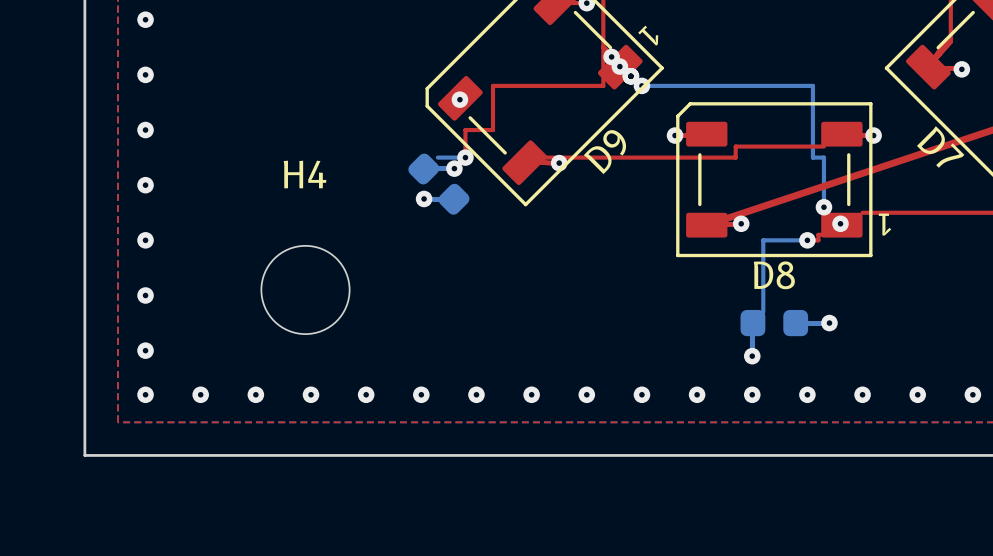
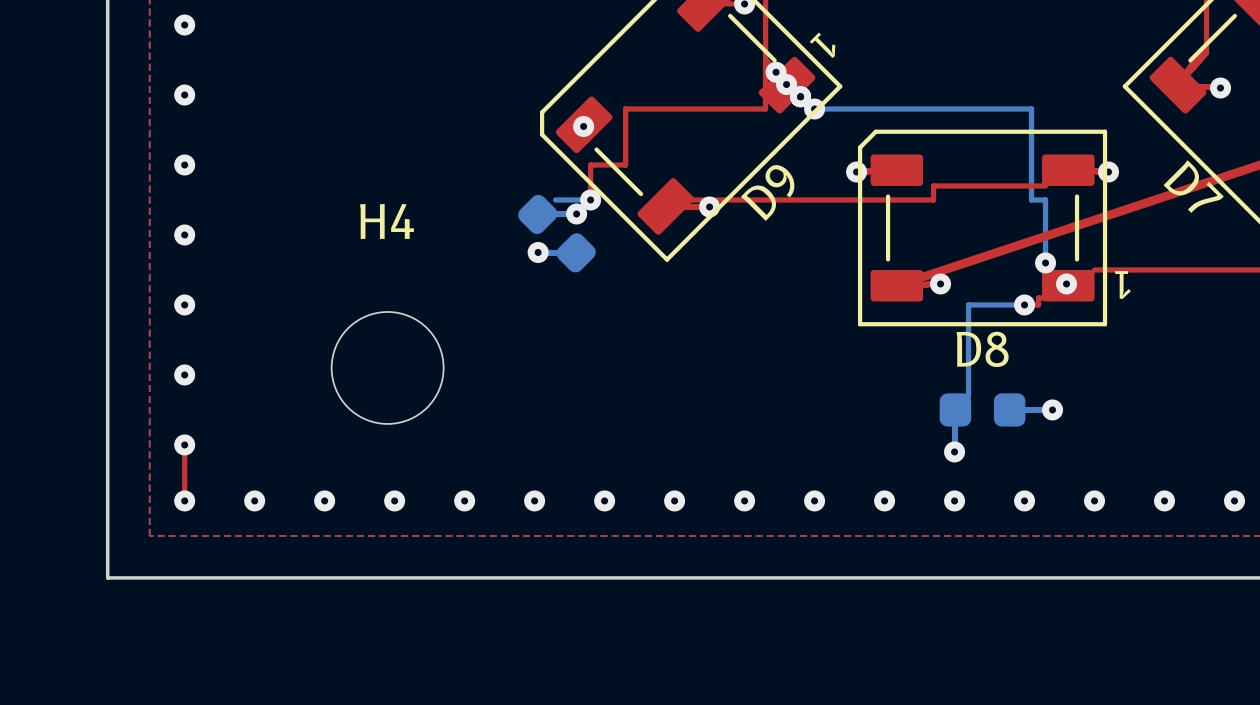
top track: none -> (184, 444) (184, 500)

